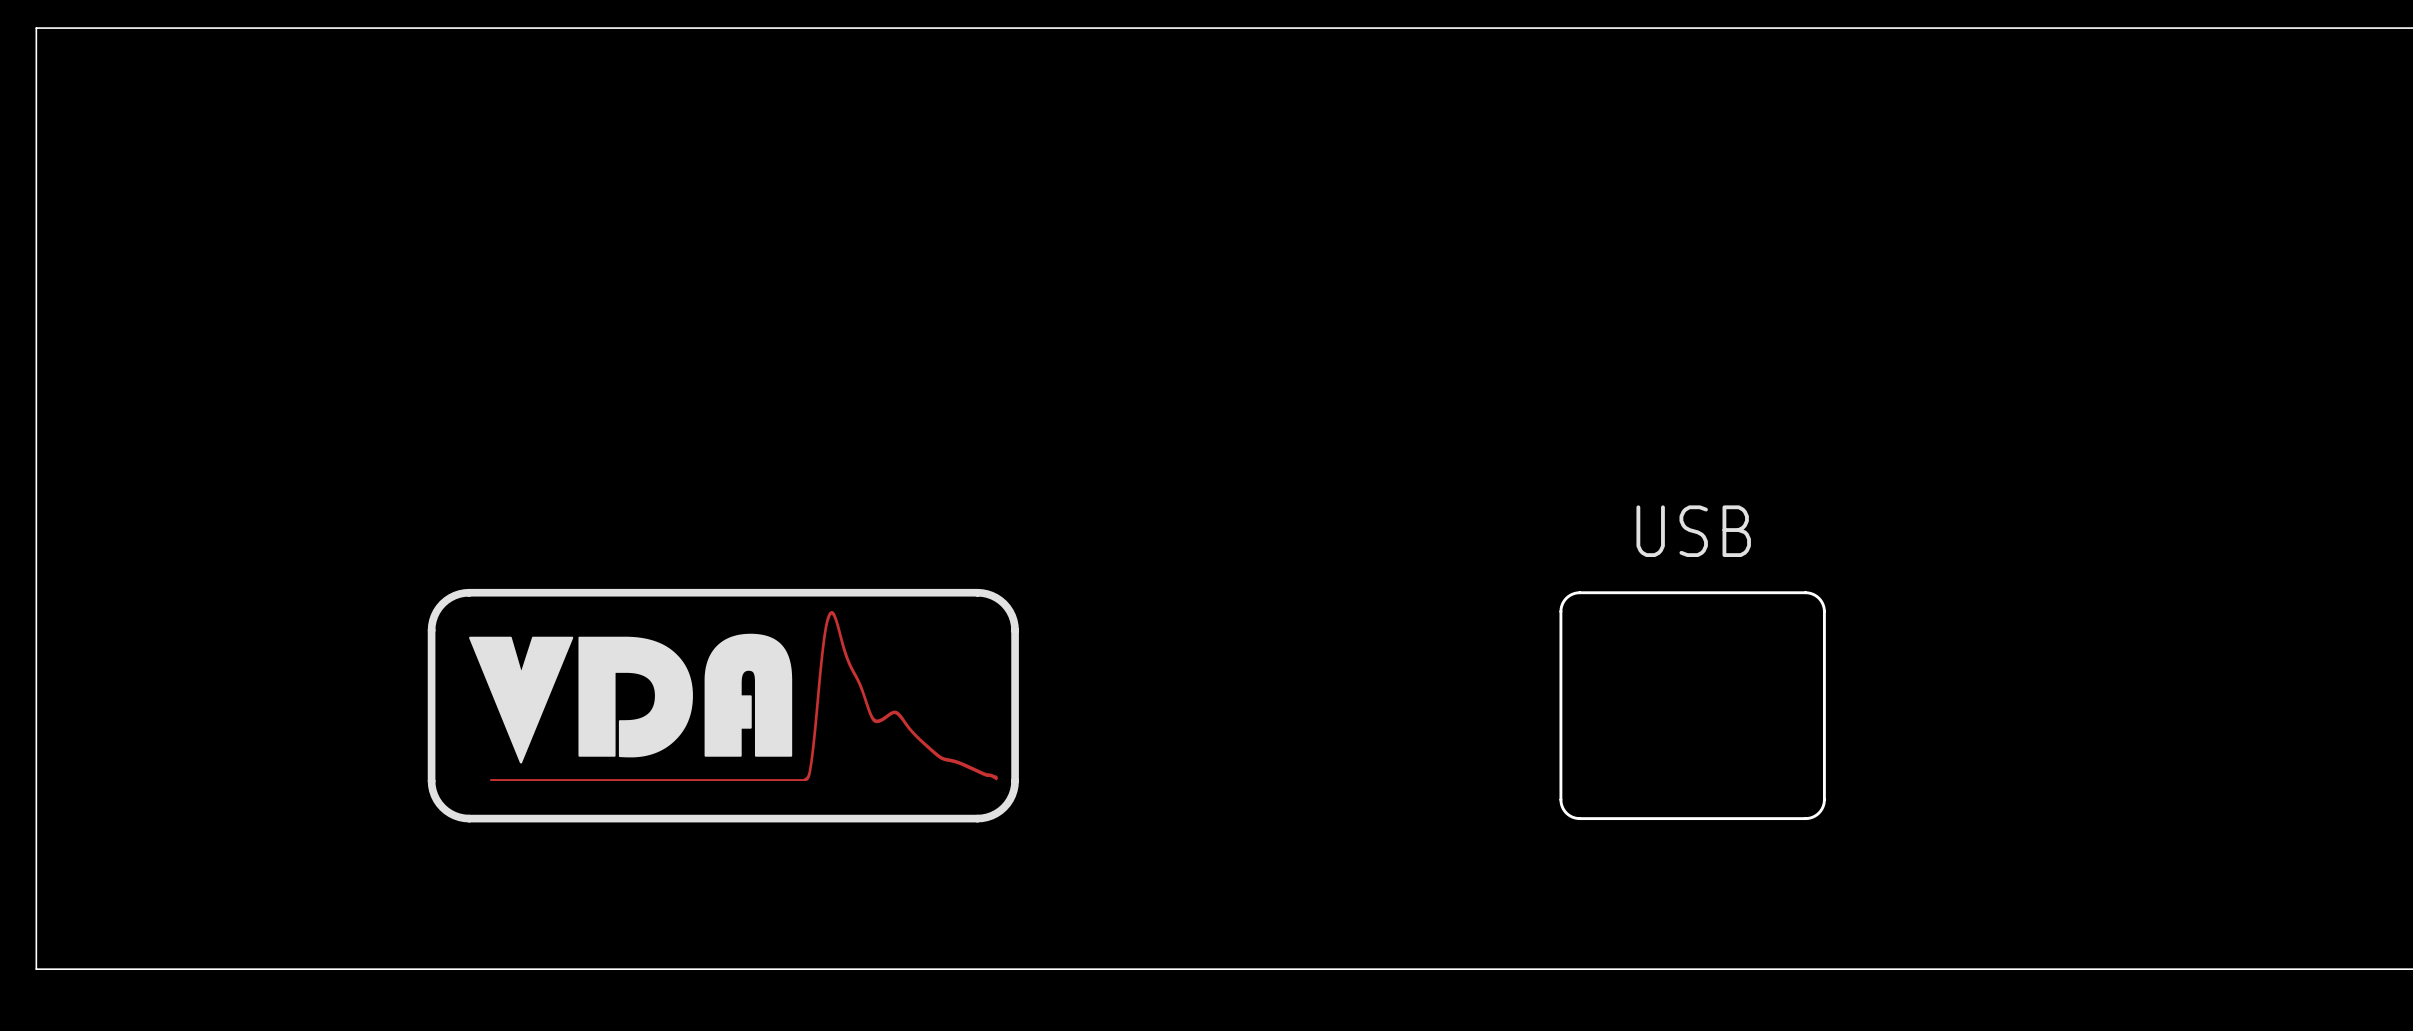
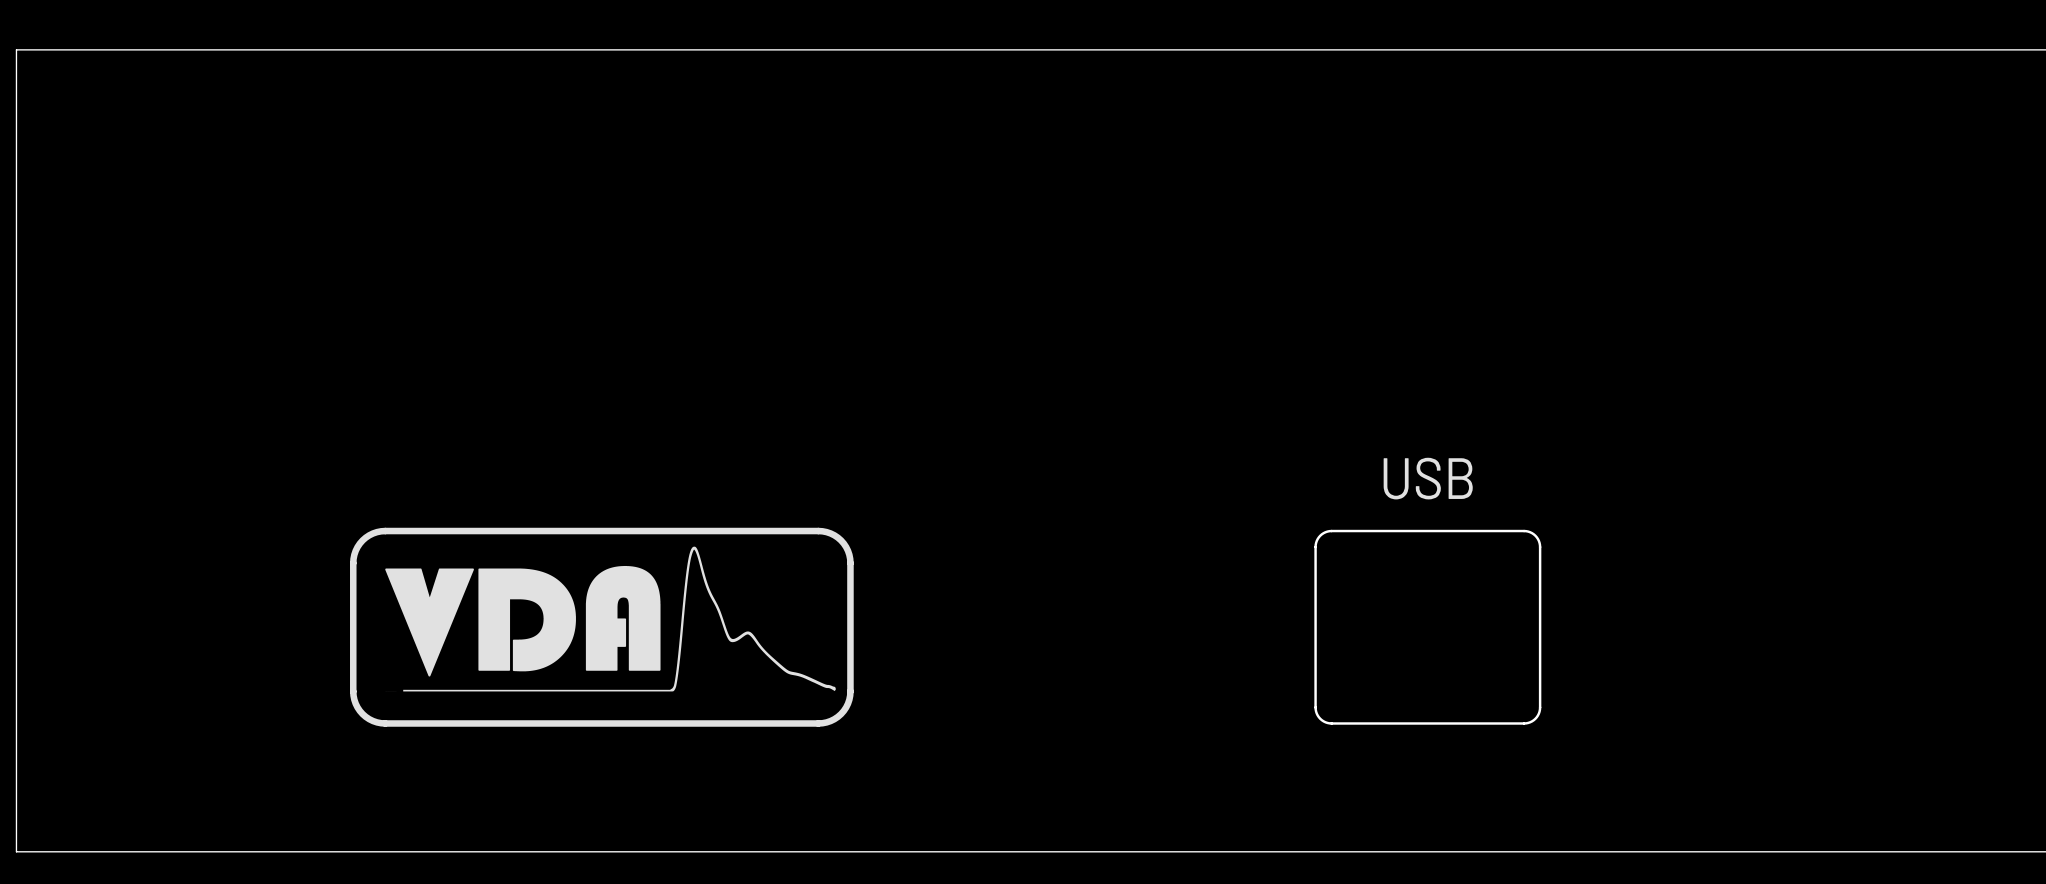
drawing shape: [427, 588, 1019, 823] -> [350, 527, 854, 727]

